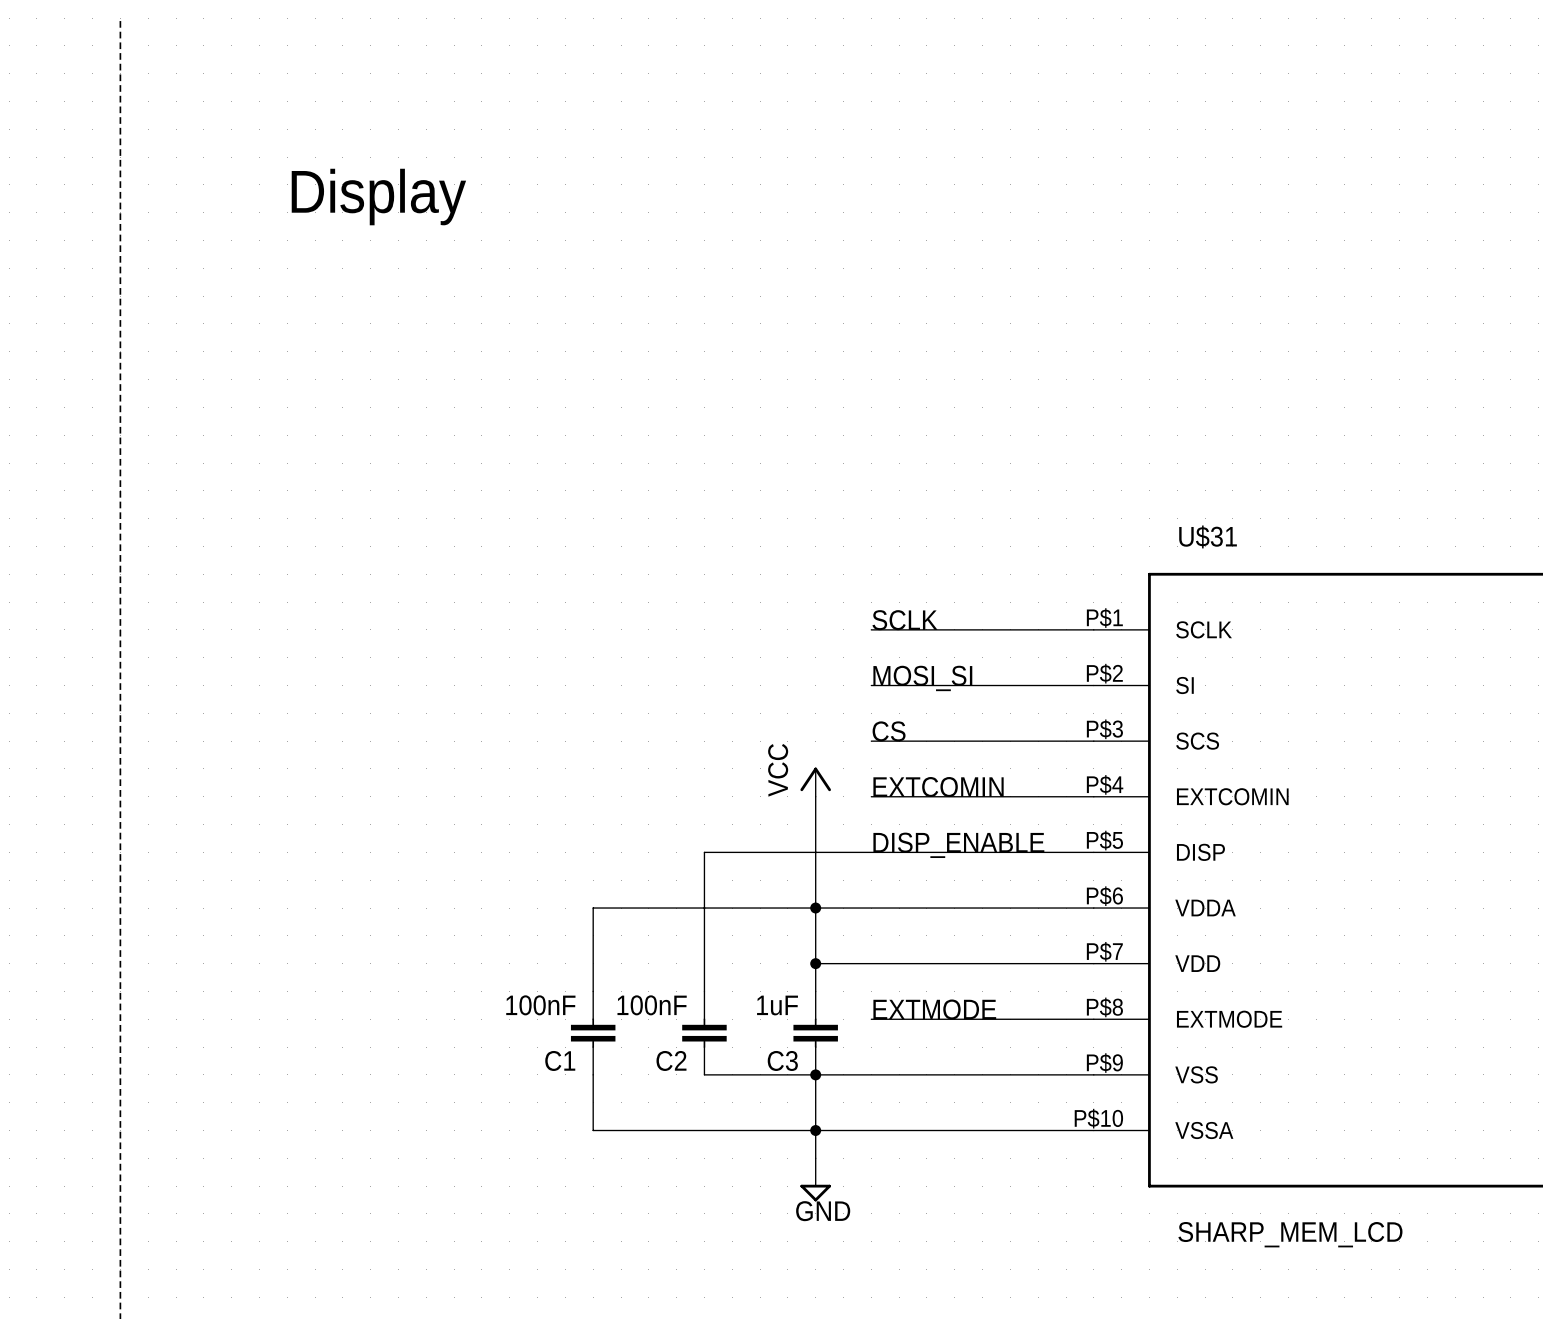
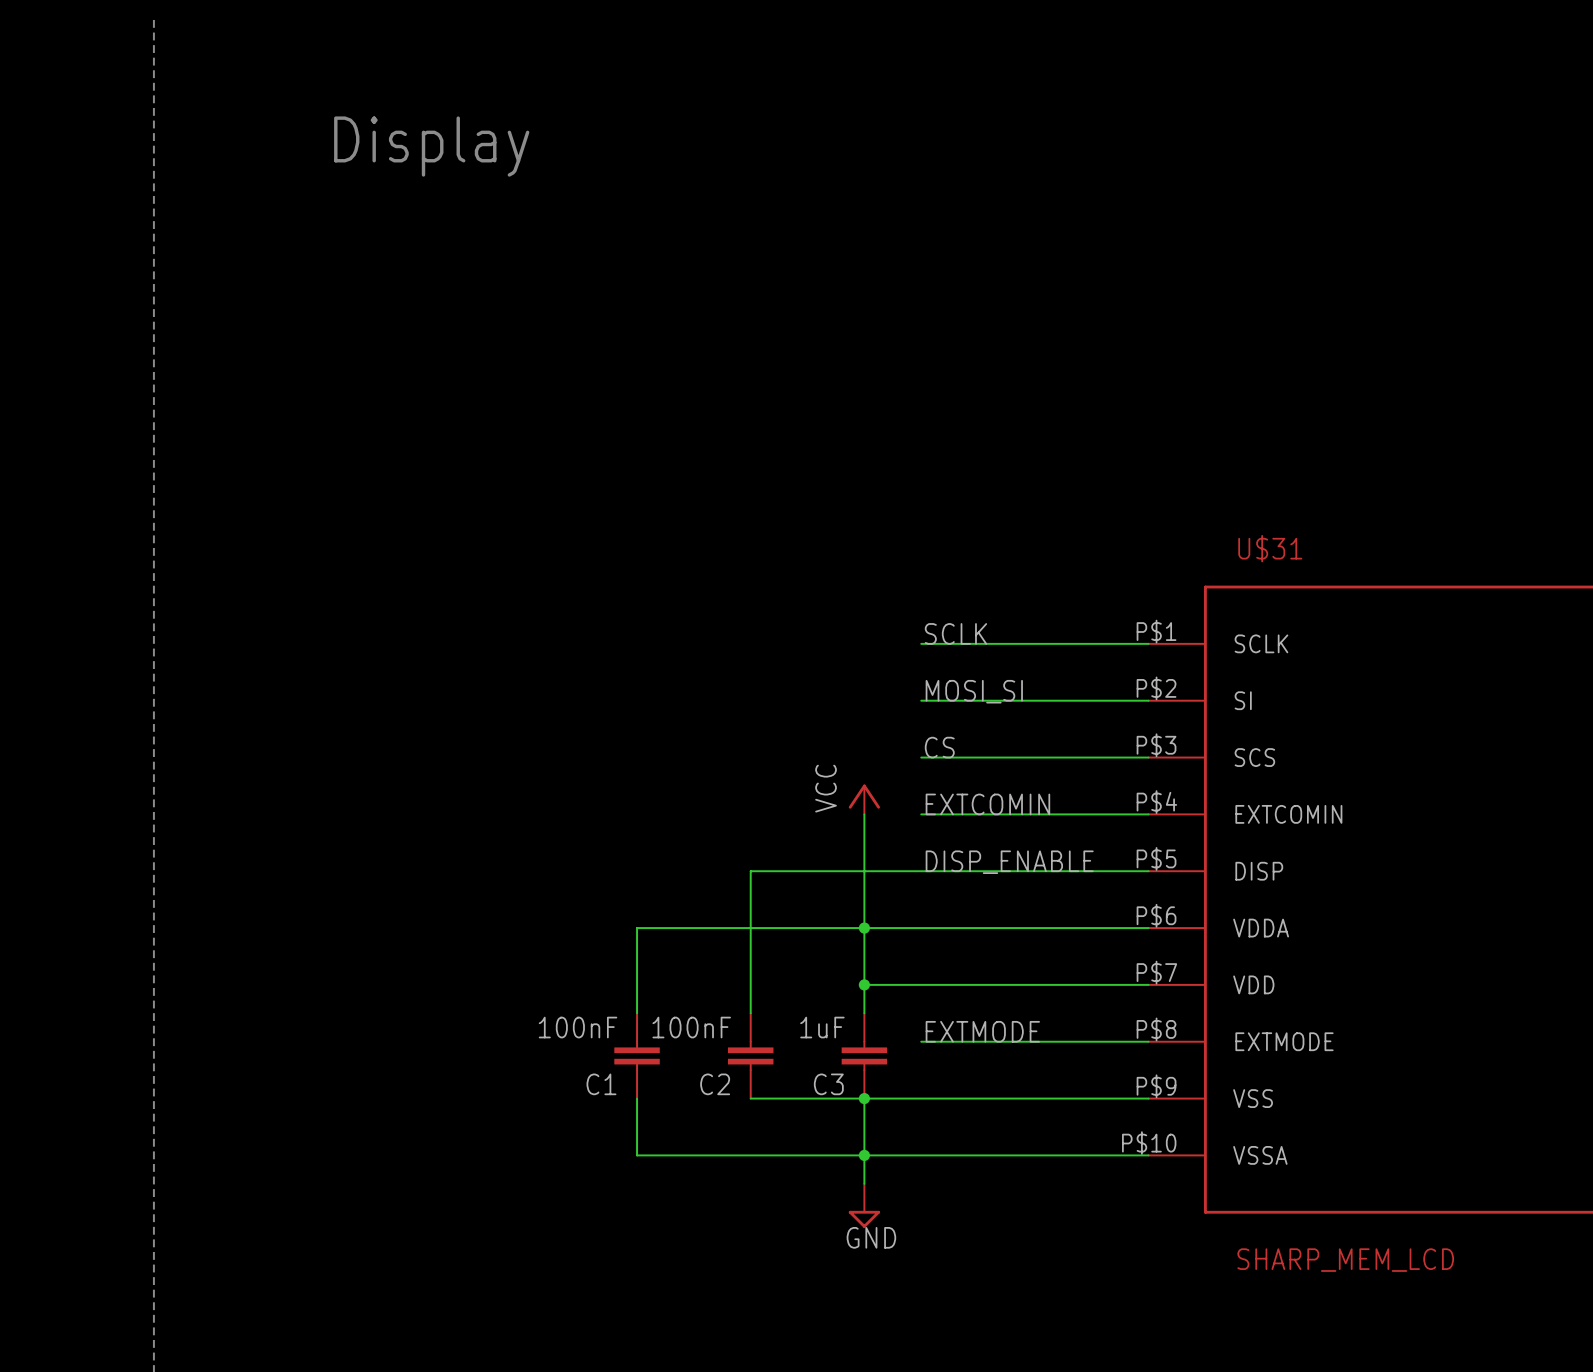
text position: Display (378, 197) -> Display (431, 146)

